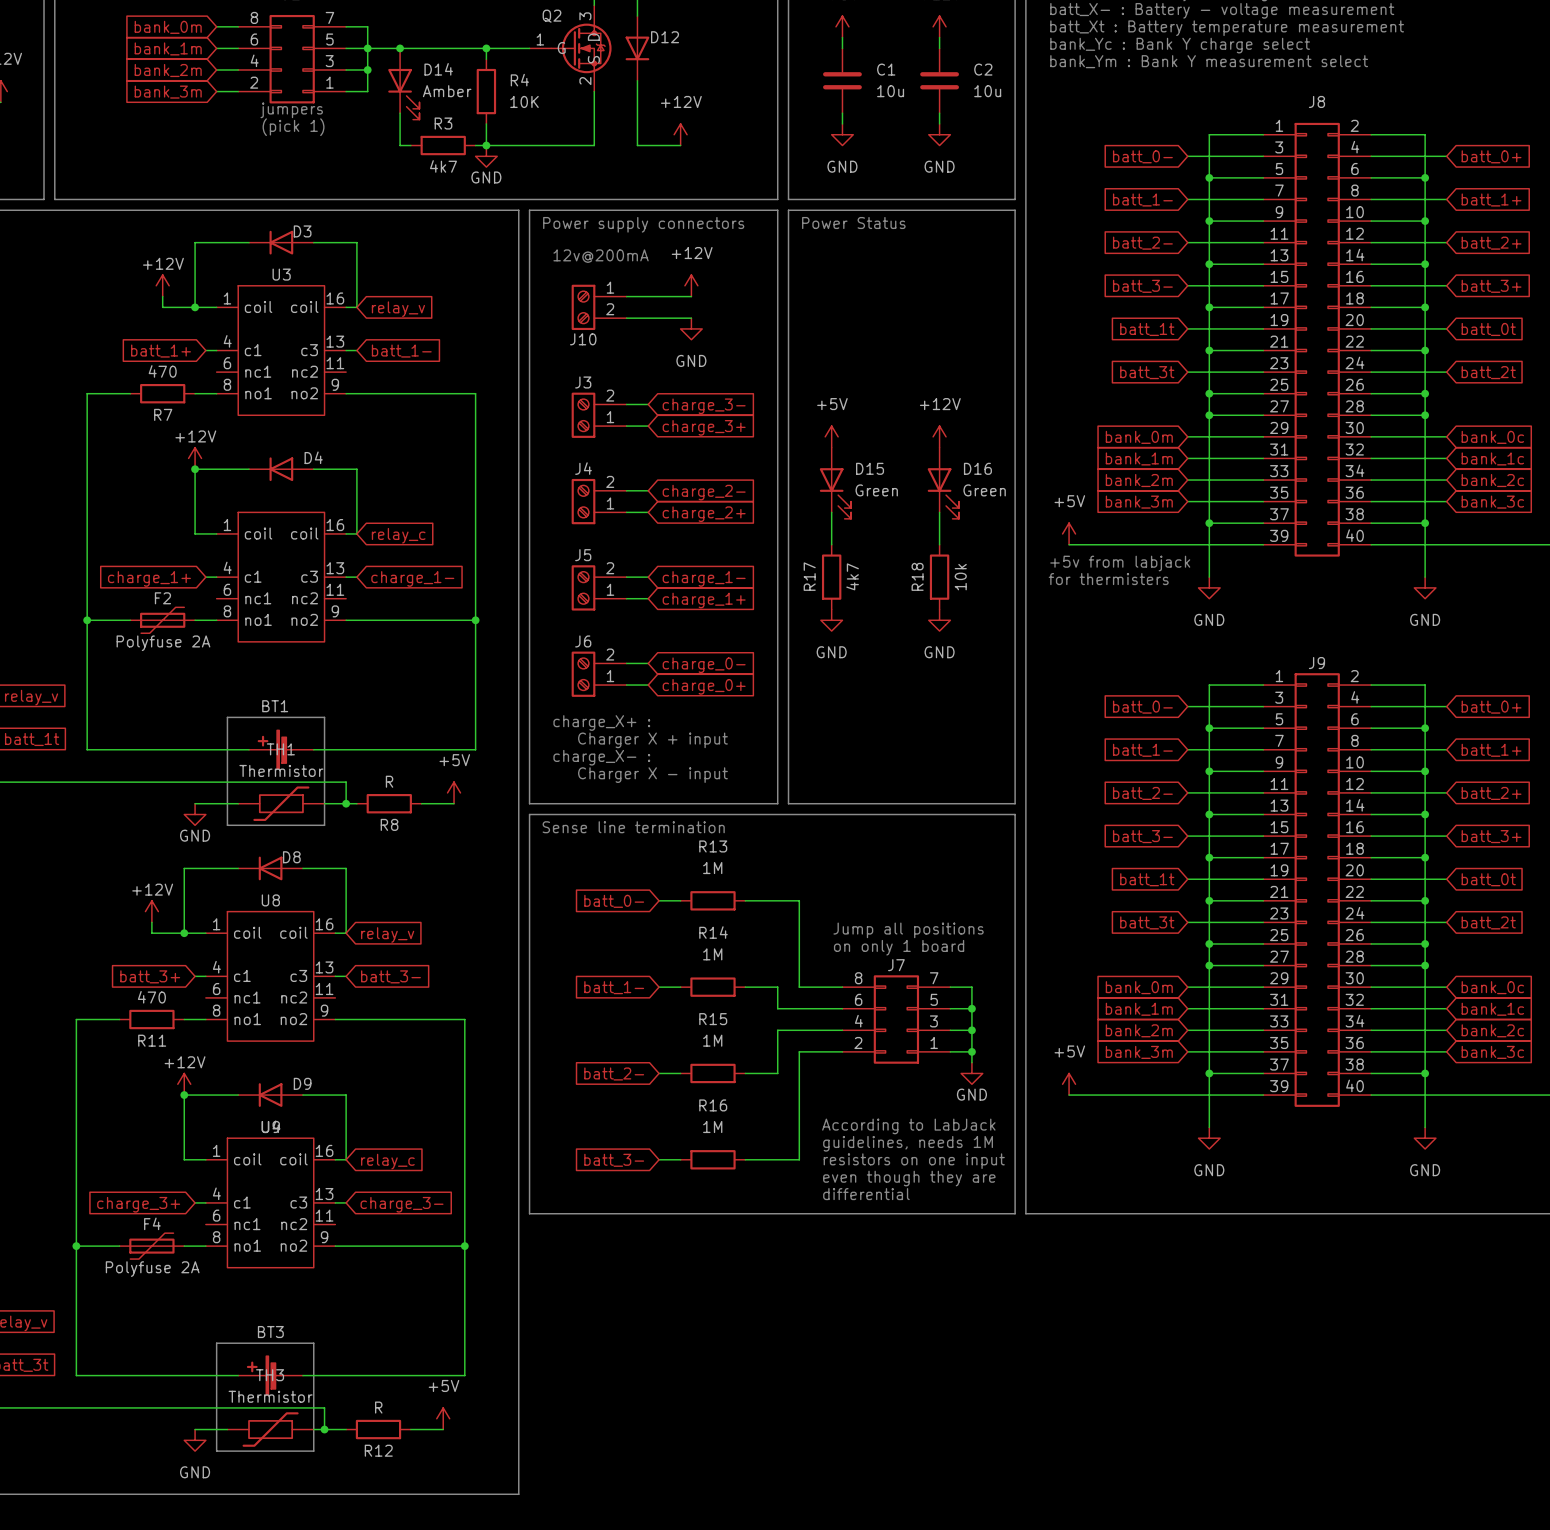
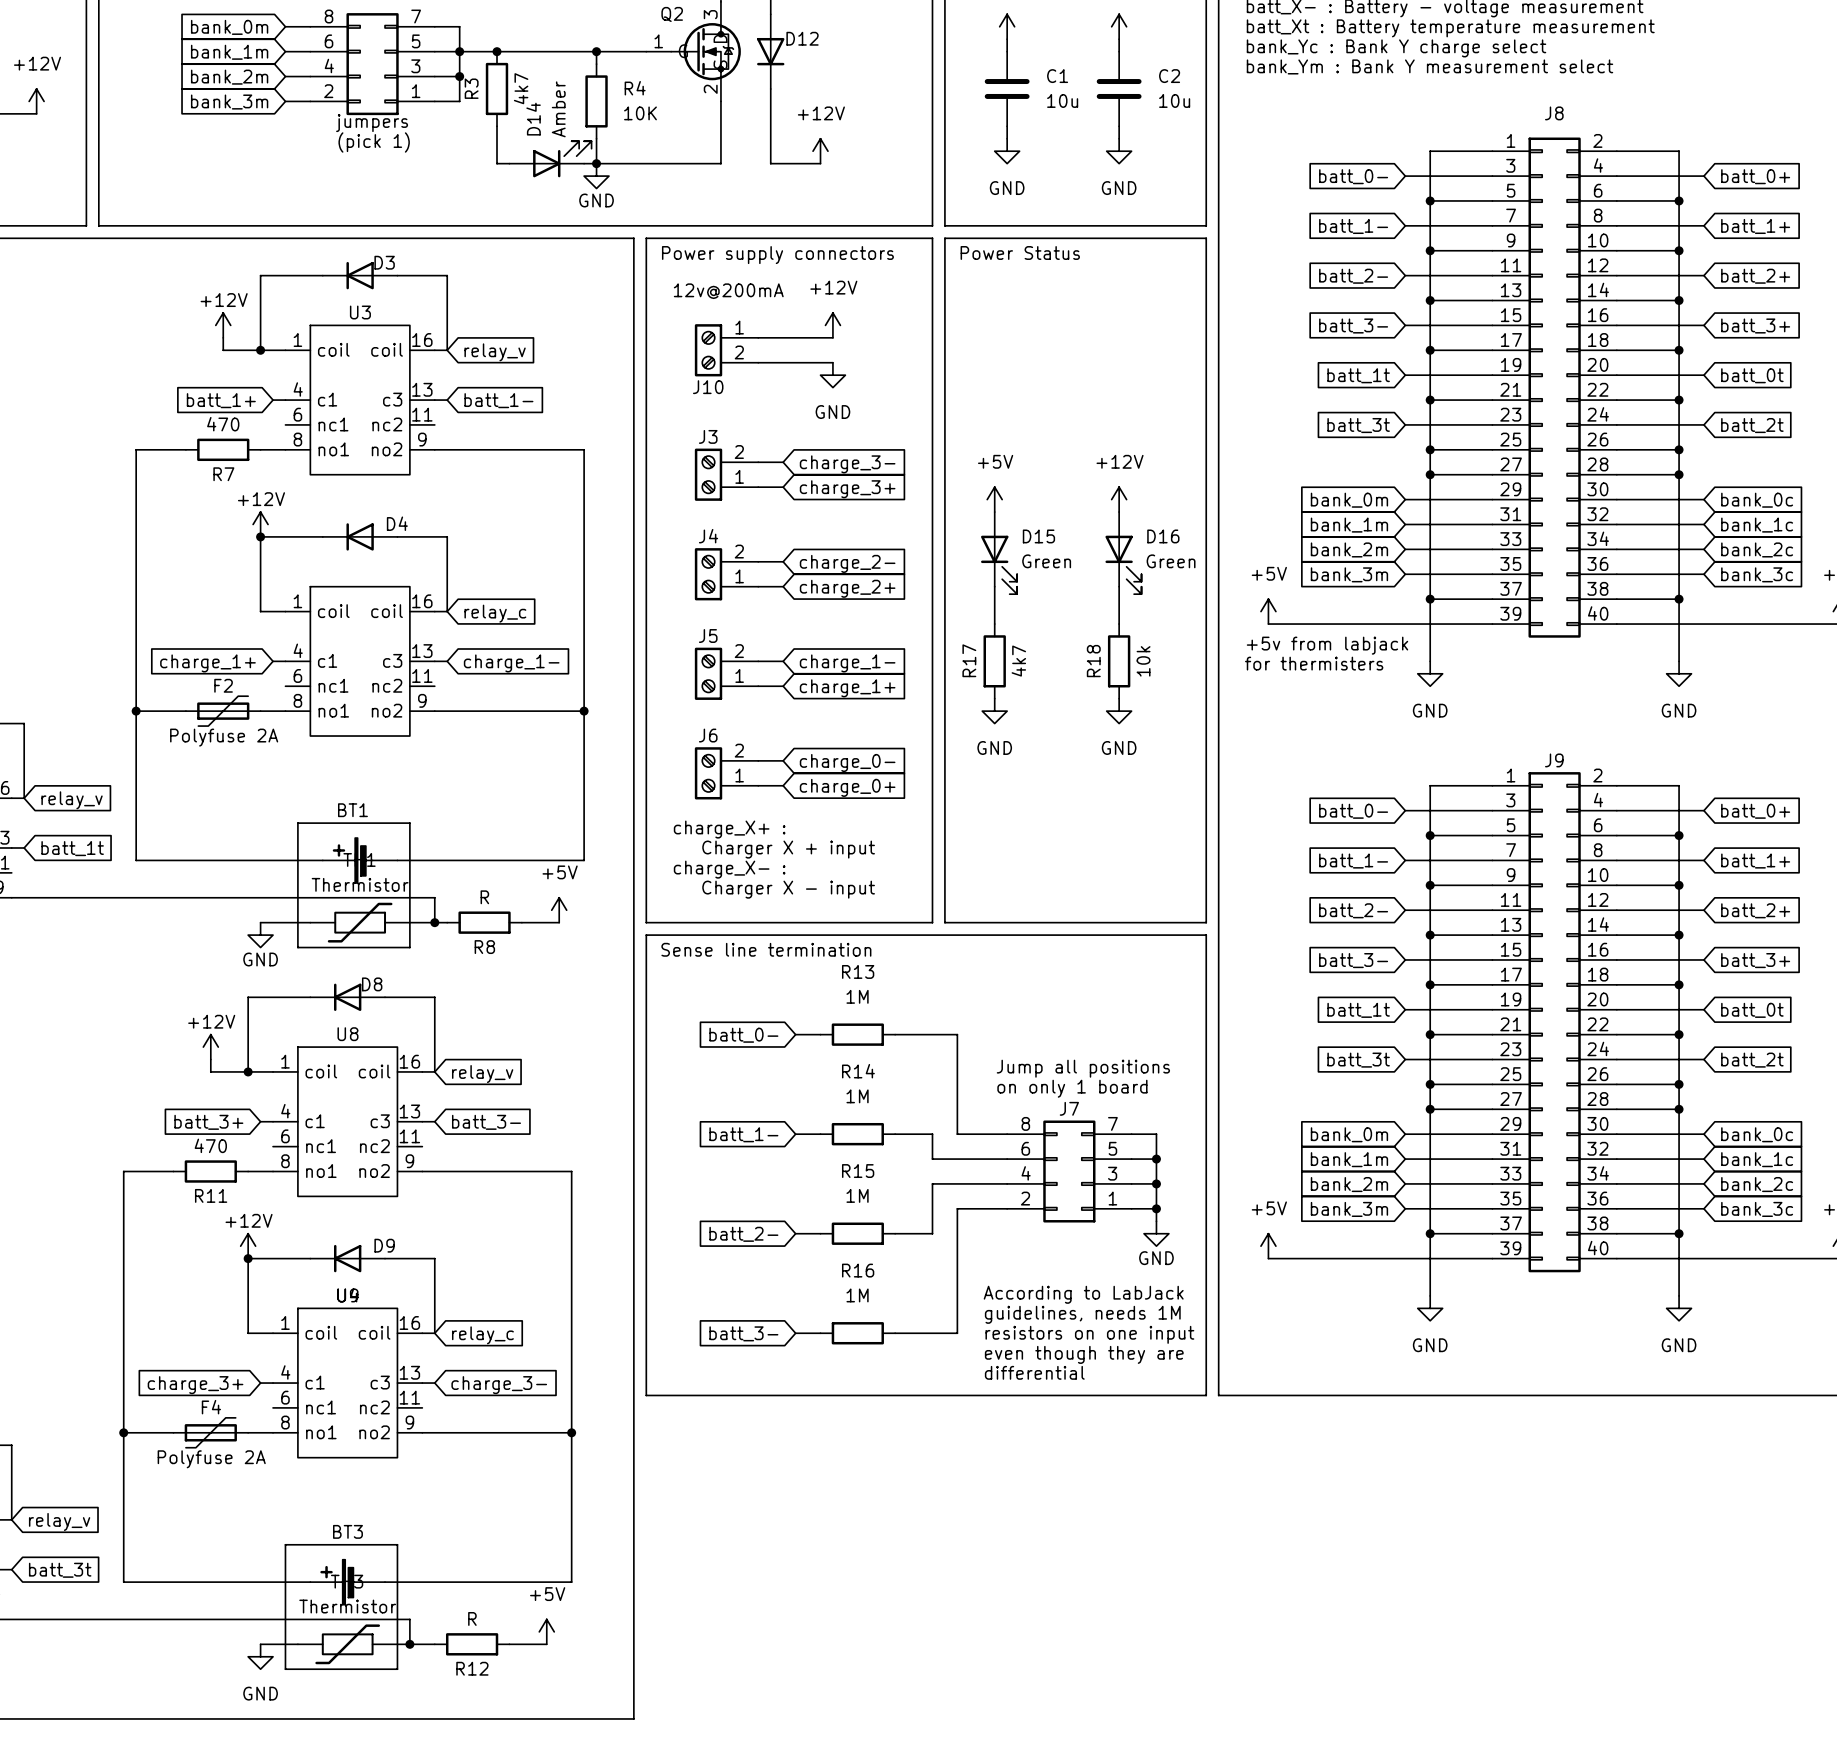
D14 position: (403, 84) -> (550, 159)
D14 rotation: 0° (403, 94) -> 90° counterclockwise (562, 159)
R3 name position: R3 (443, 123) -> R3 (471, 88)
R3 rotation: 0° (443, 145) -> 90° clockwise (497, 88)
R3 position: (443, 145) -> (497, 88)
R3 value position: 4k7 (443, 166) -> 4k7 (521, 88)

